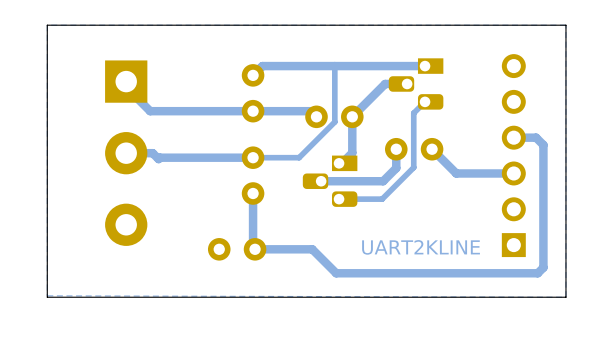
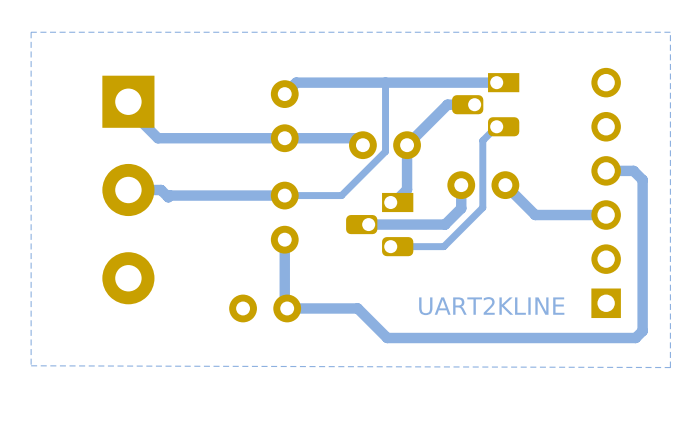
board edge: (565, 25) (47, 25) (47, 297) (565, 297) (565, 25) -> none

